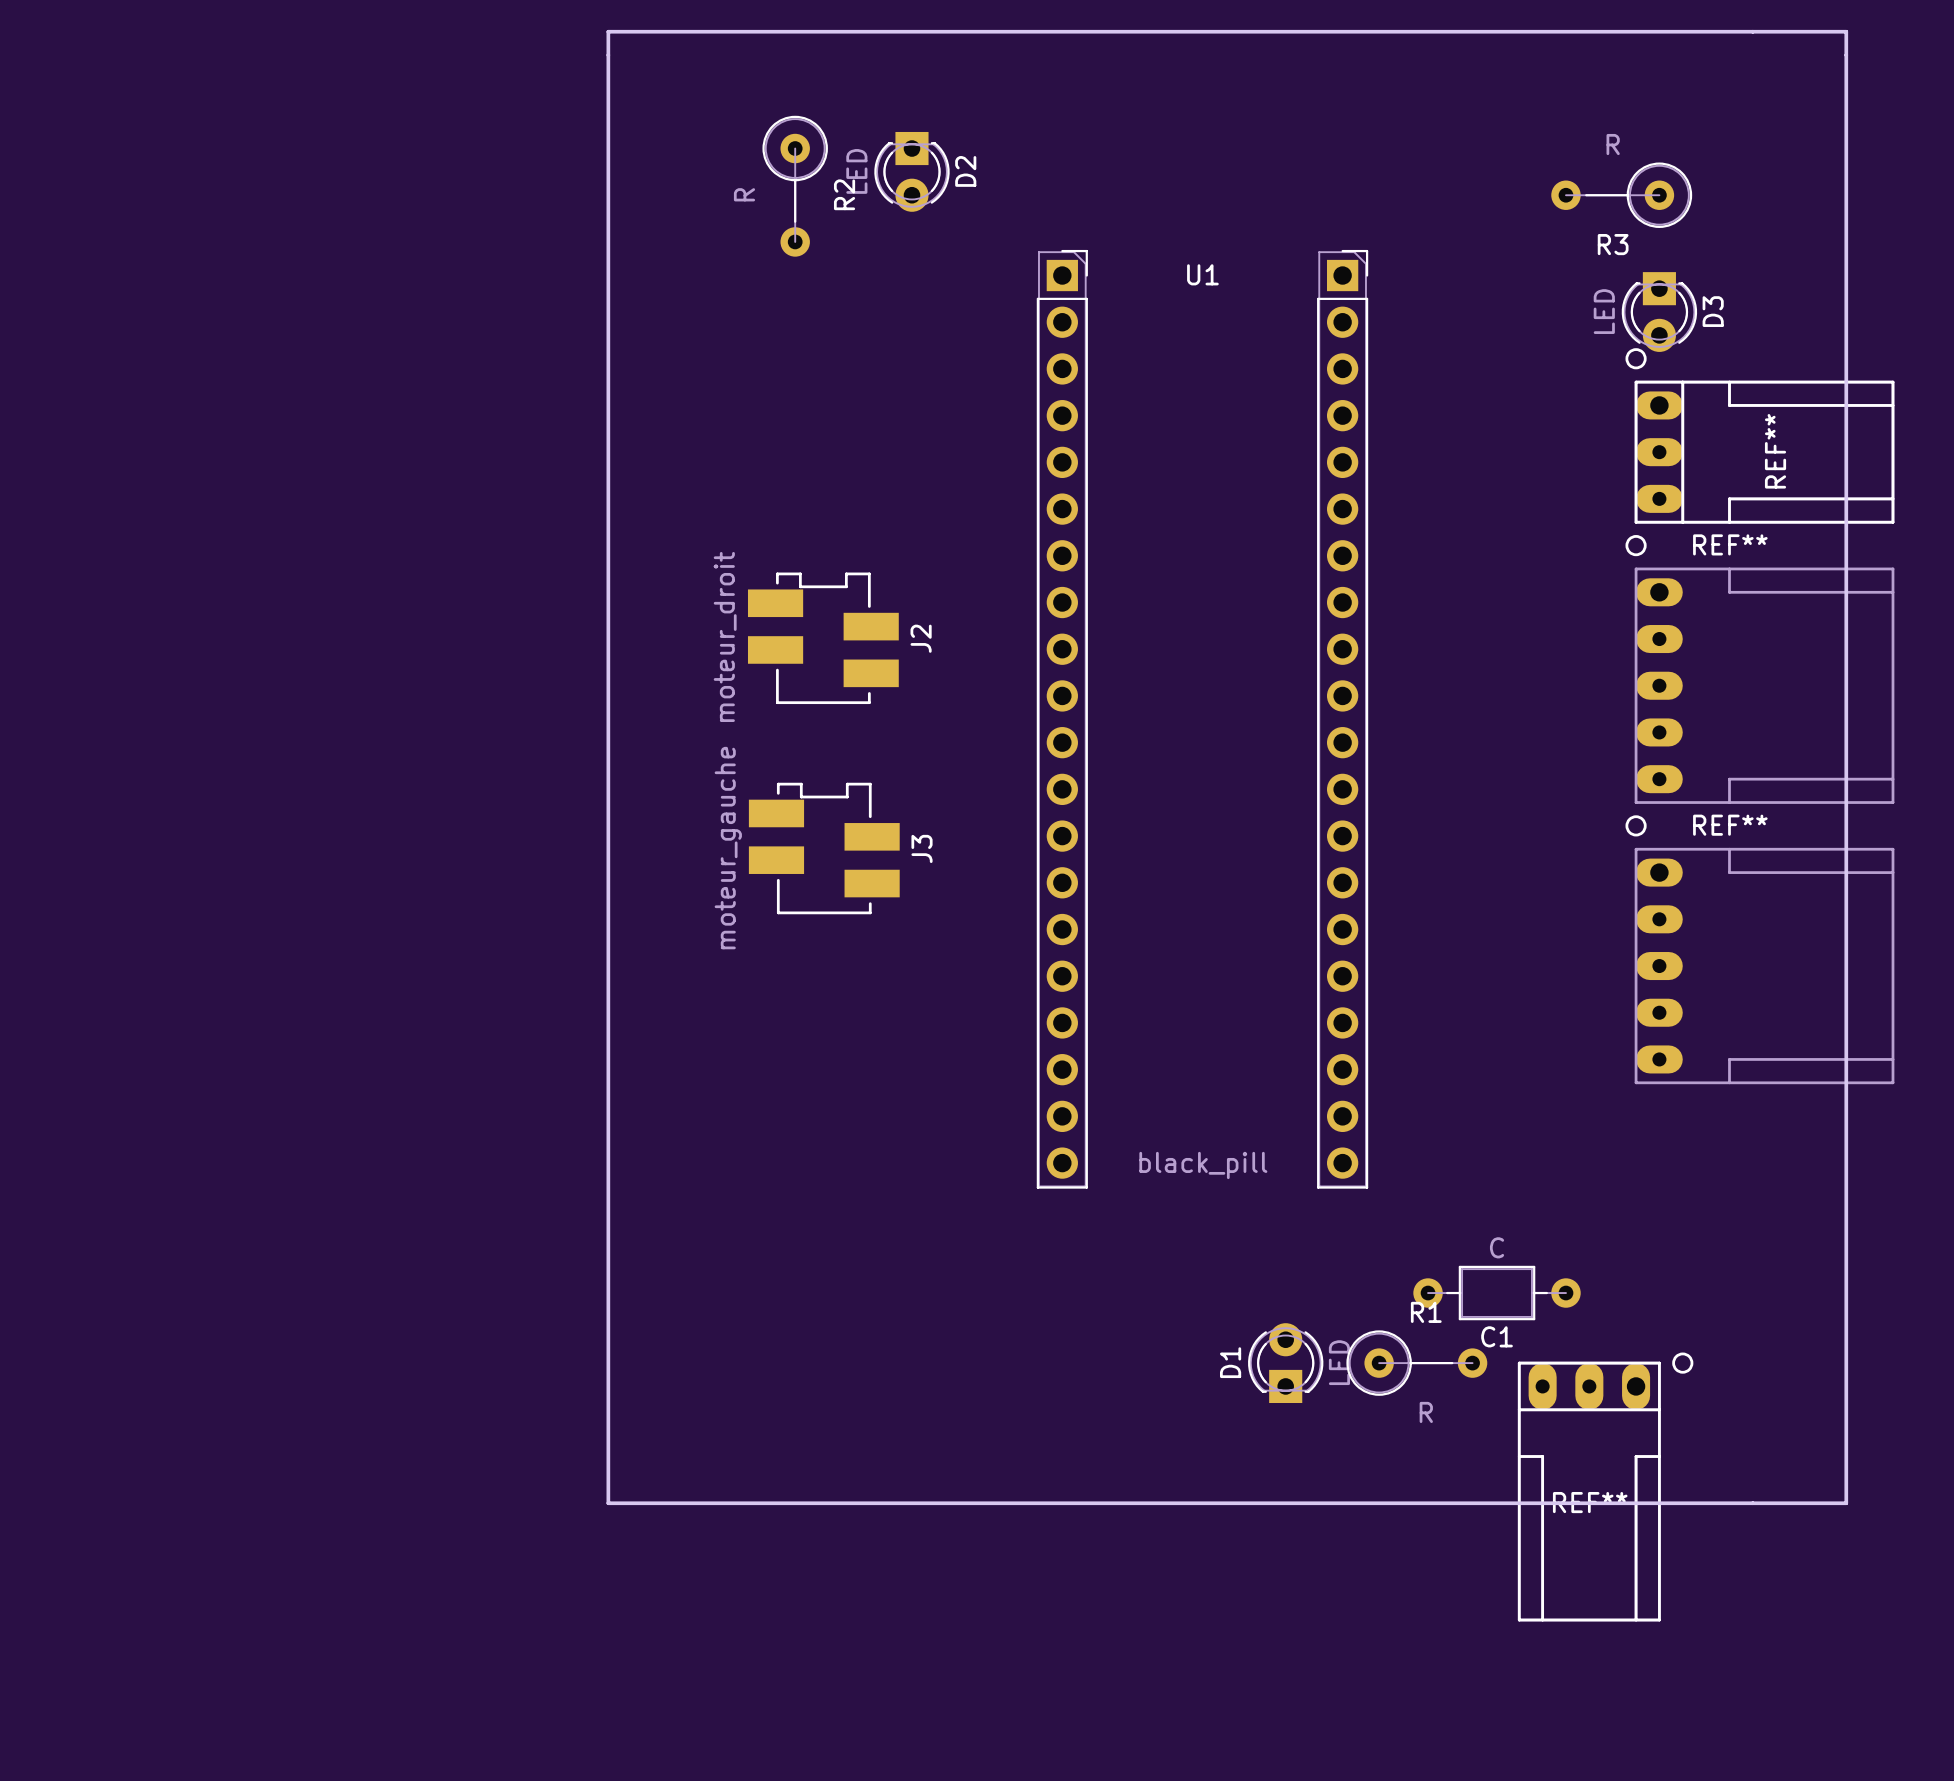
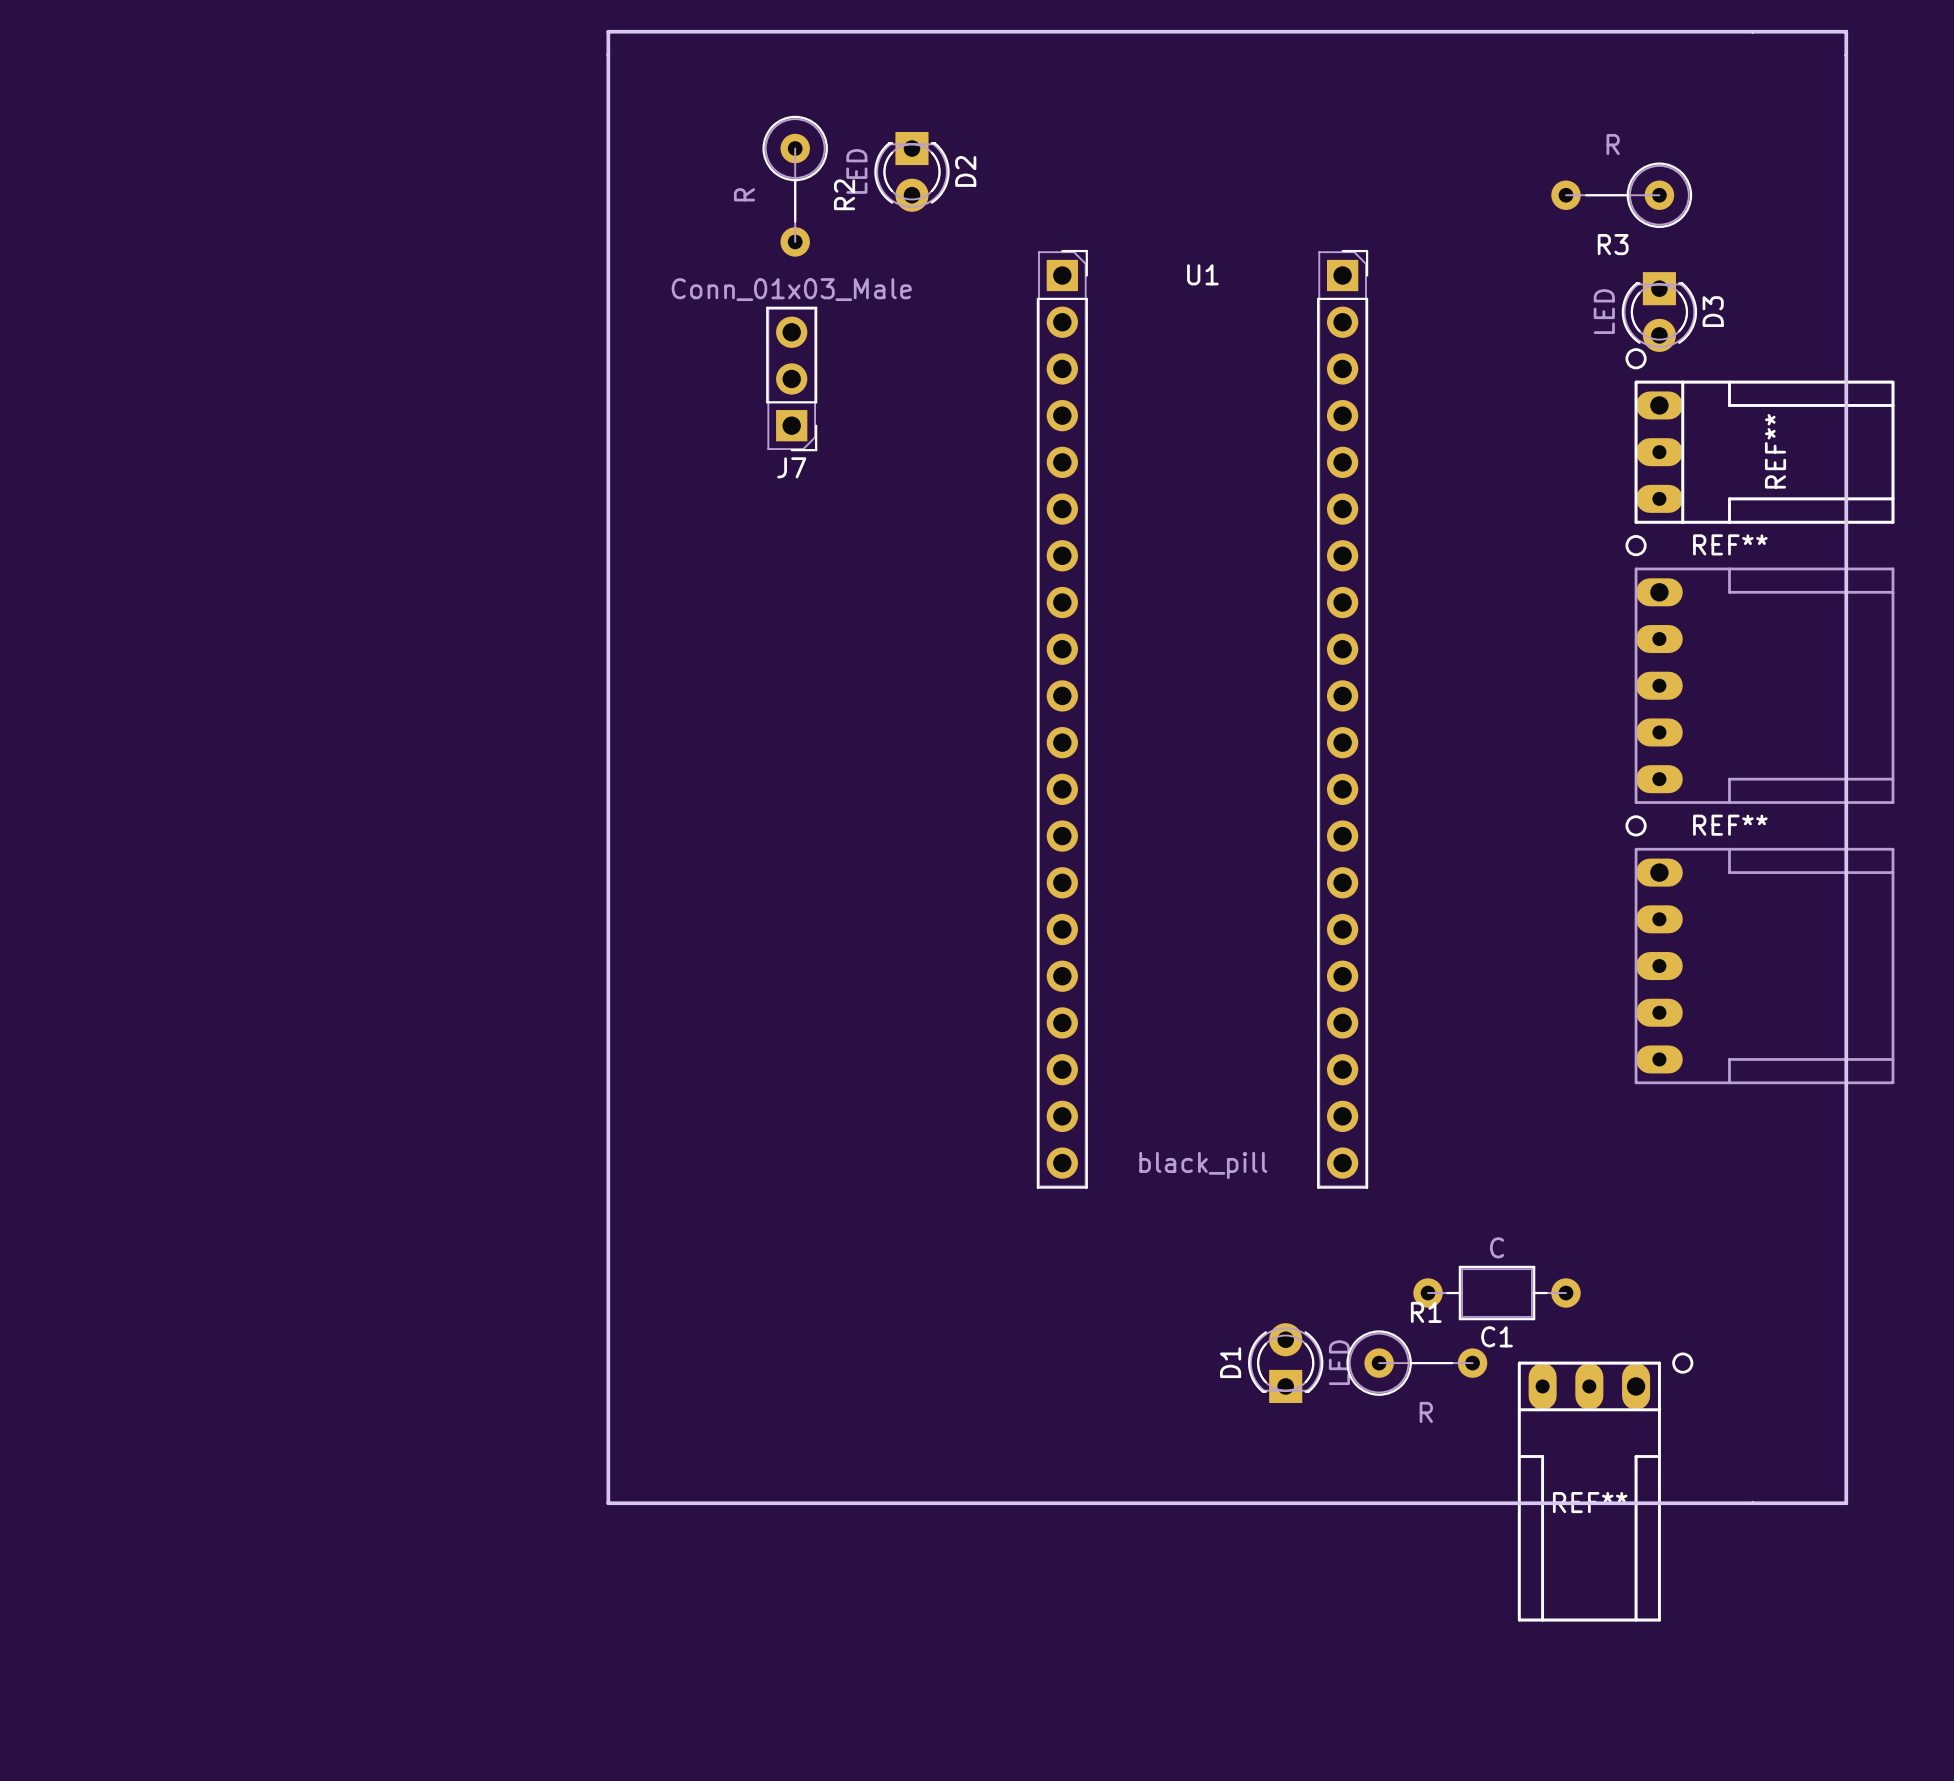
J7: none -> Conn_01x03_Male (791, 378)
J2: moteur_droit (823, 638) -> none
J3: moteur_gauche (824, 848) -> none

